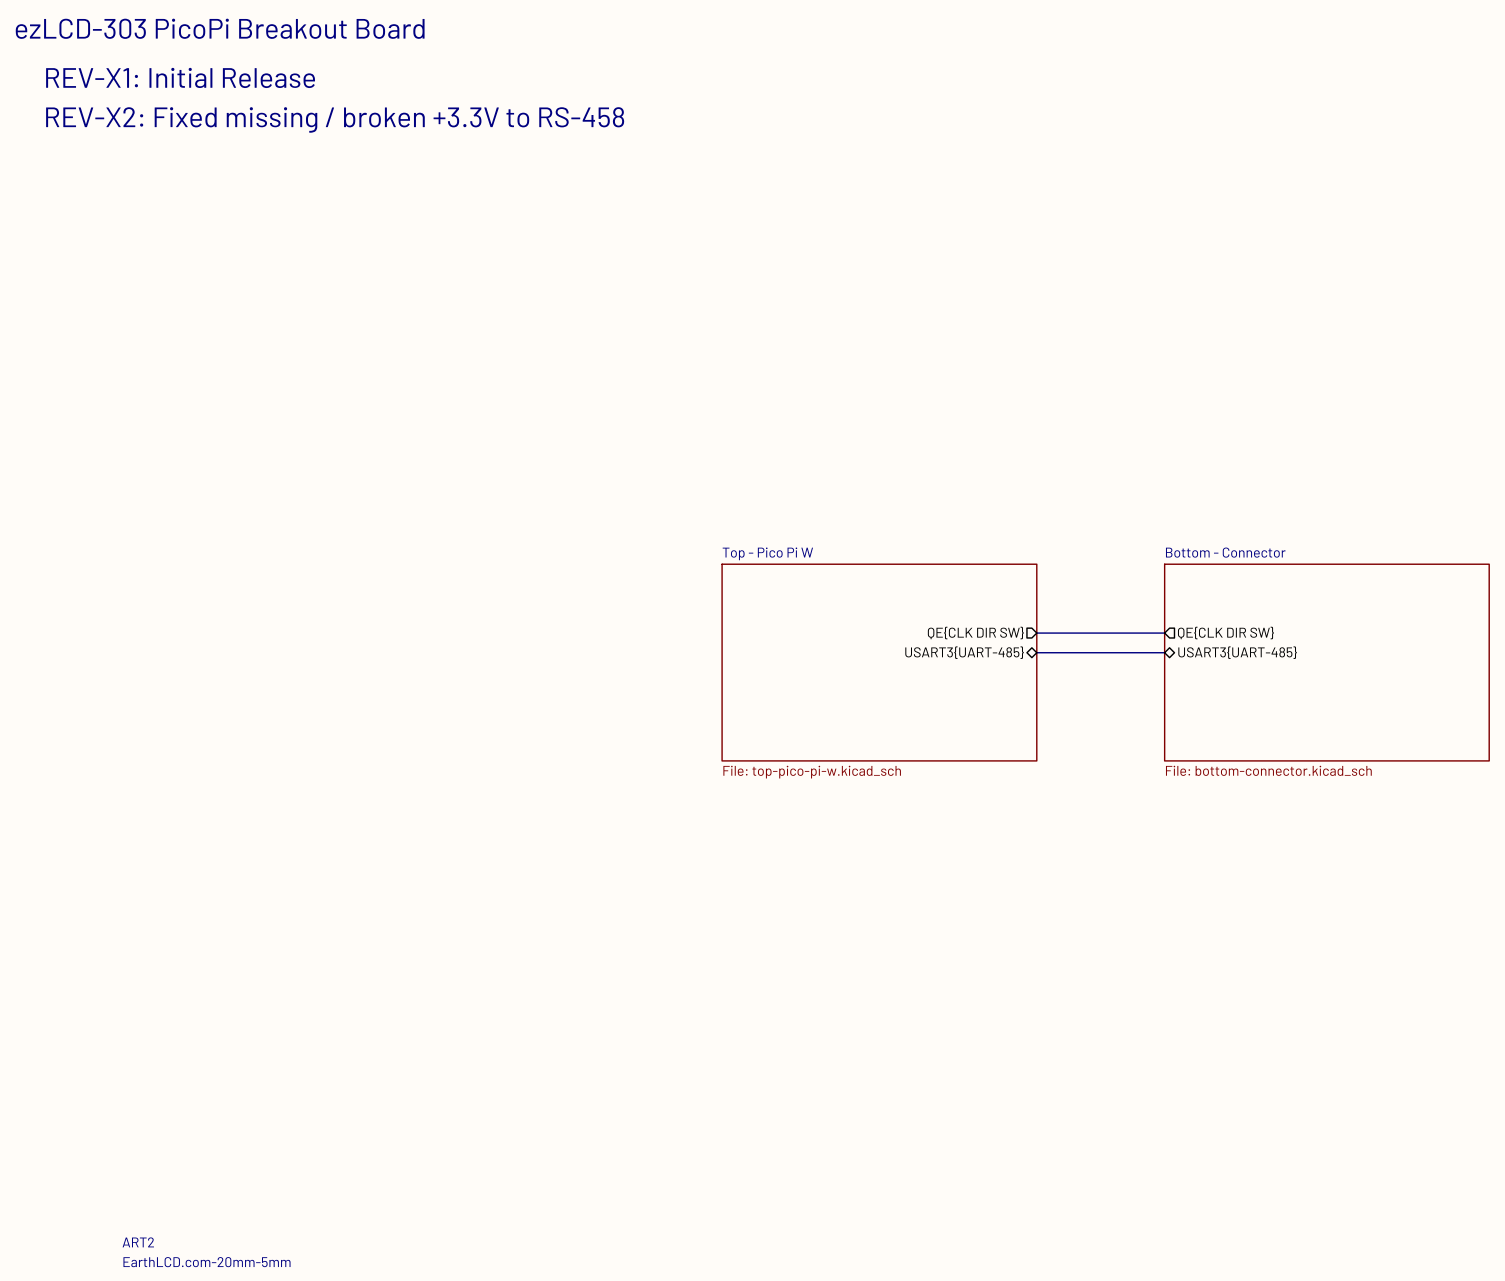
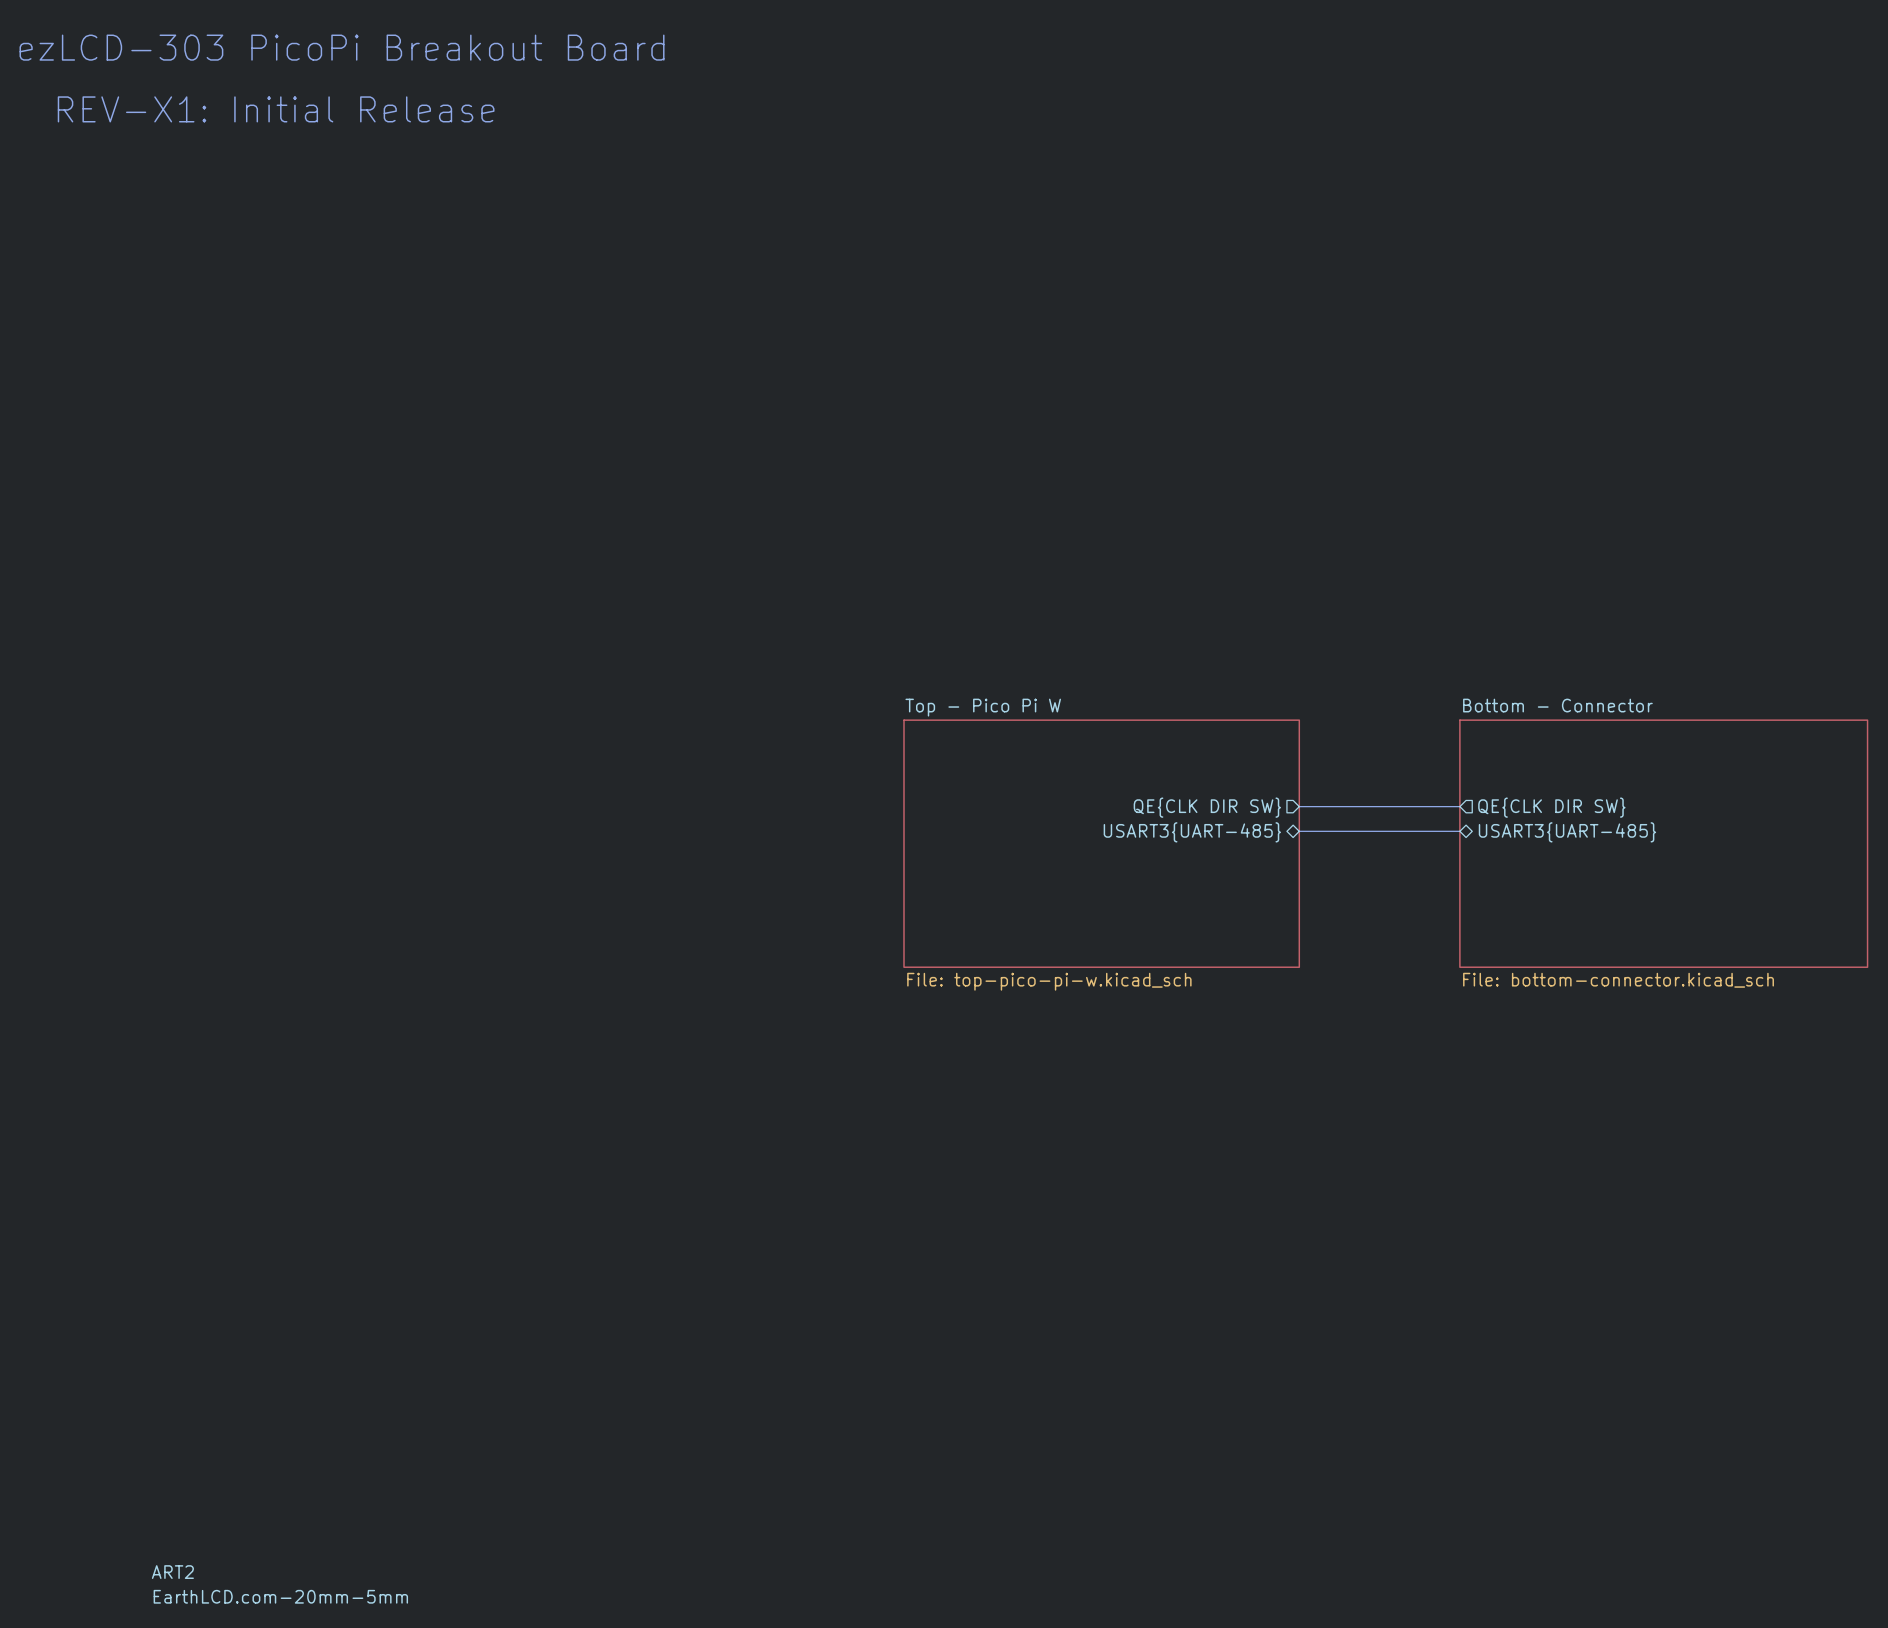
text: REV-X2: Fixed missing / broken +3.3V to RS-458 (335, 119) -> none

